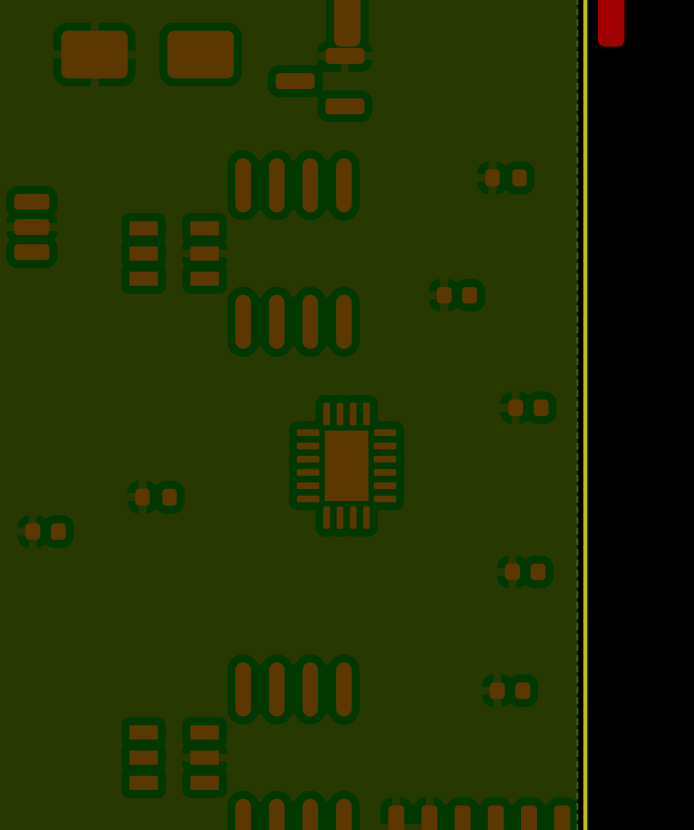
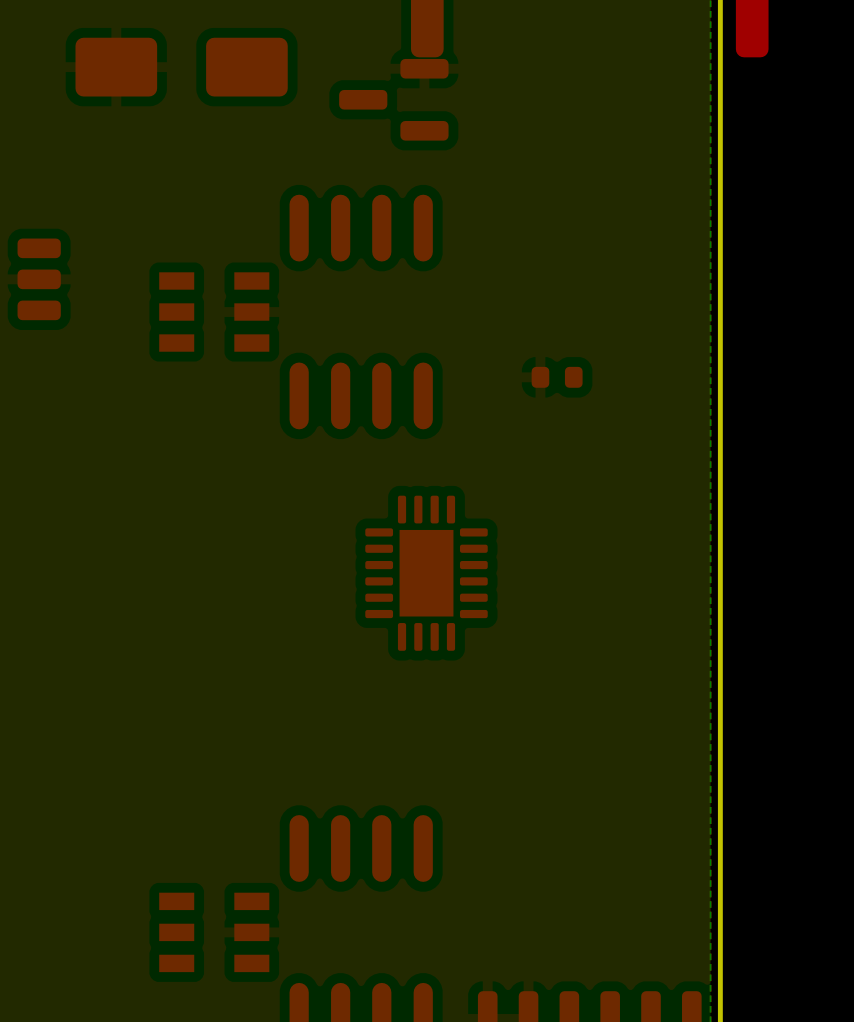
part: (506, 177) -> none
part footprint: [436, 287, 478, 304] -> [531, 366, 583, 388]
part: (528, 407) -> none
part: (156, 497) -> none
part: (45, 531) -> none
part: (525, 571) -> none
part: (510, 690) -> none

